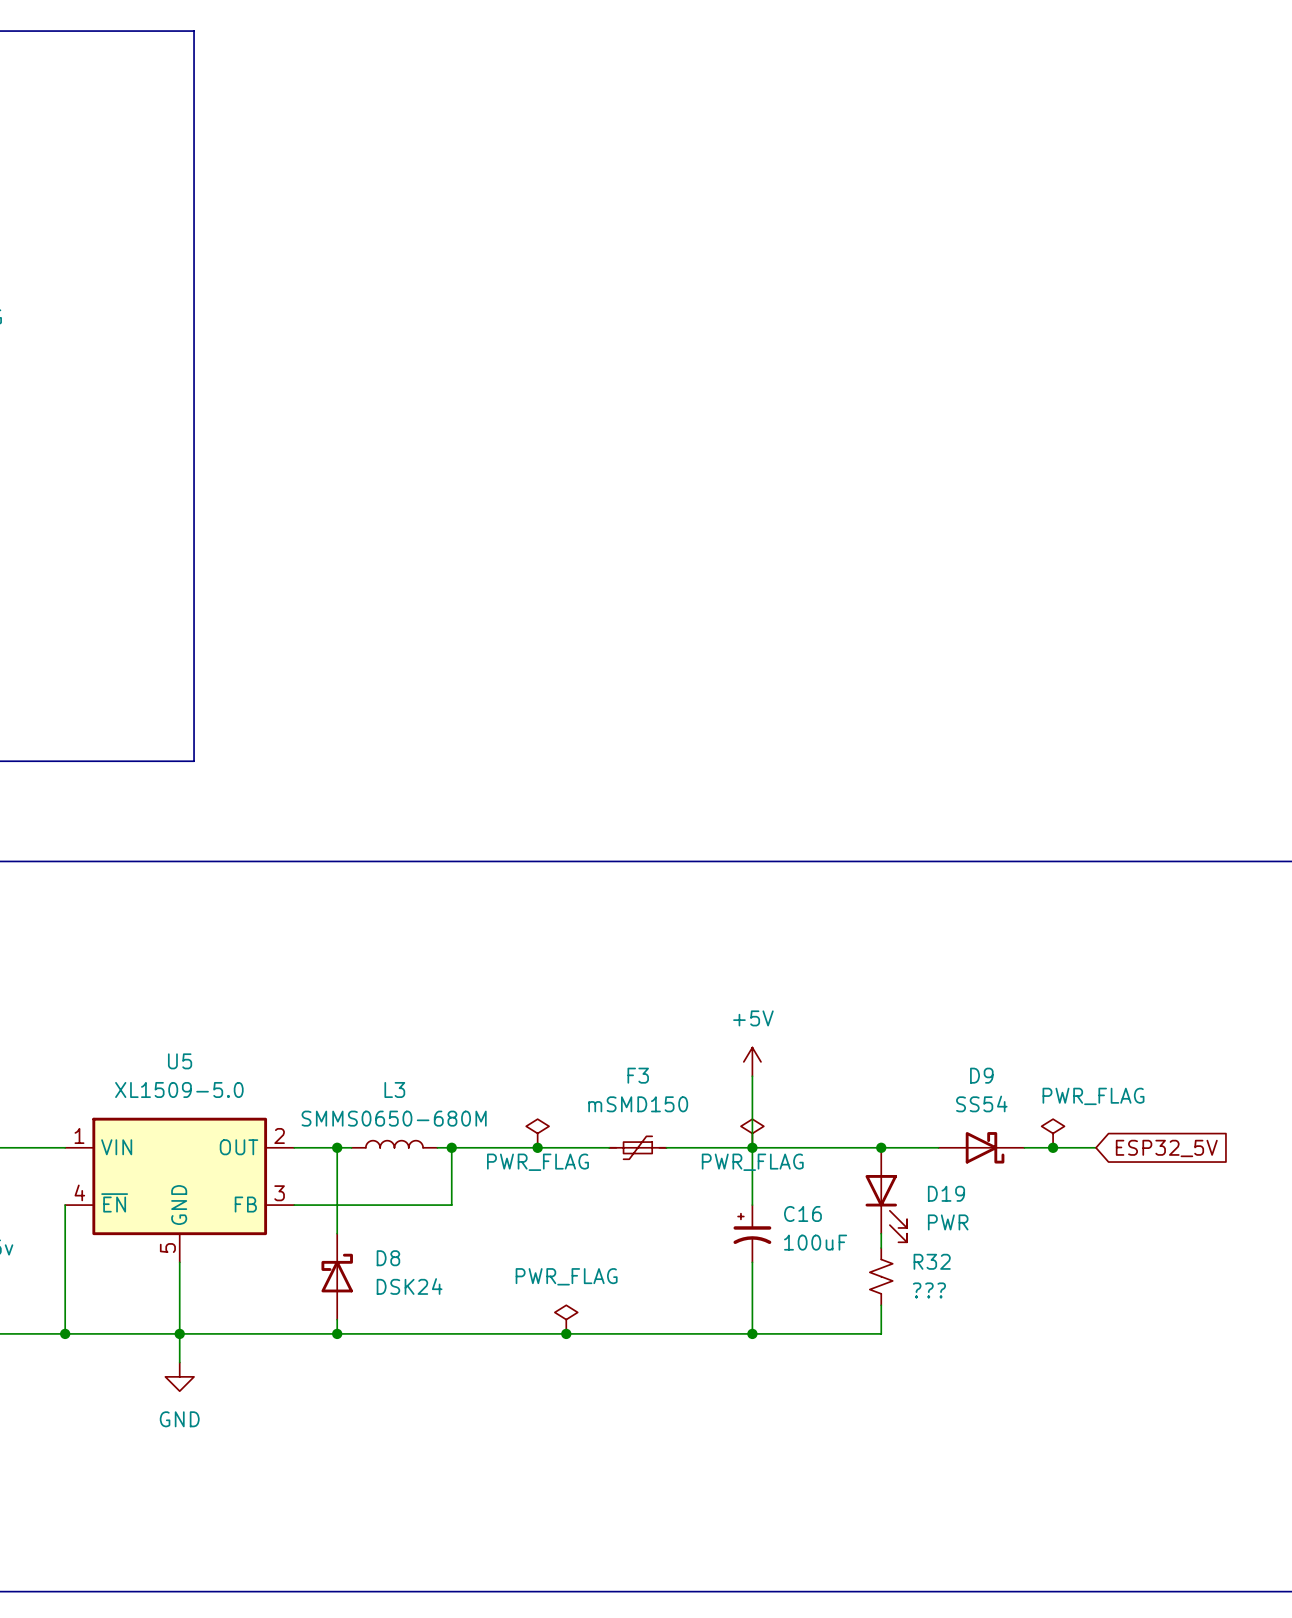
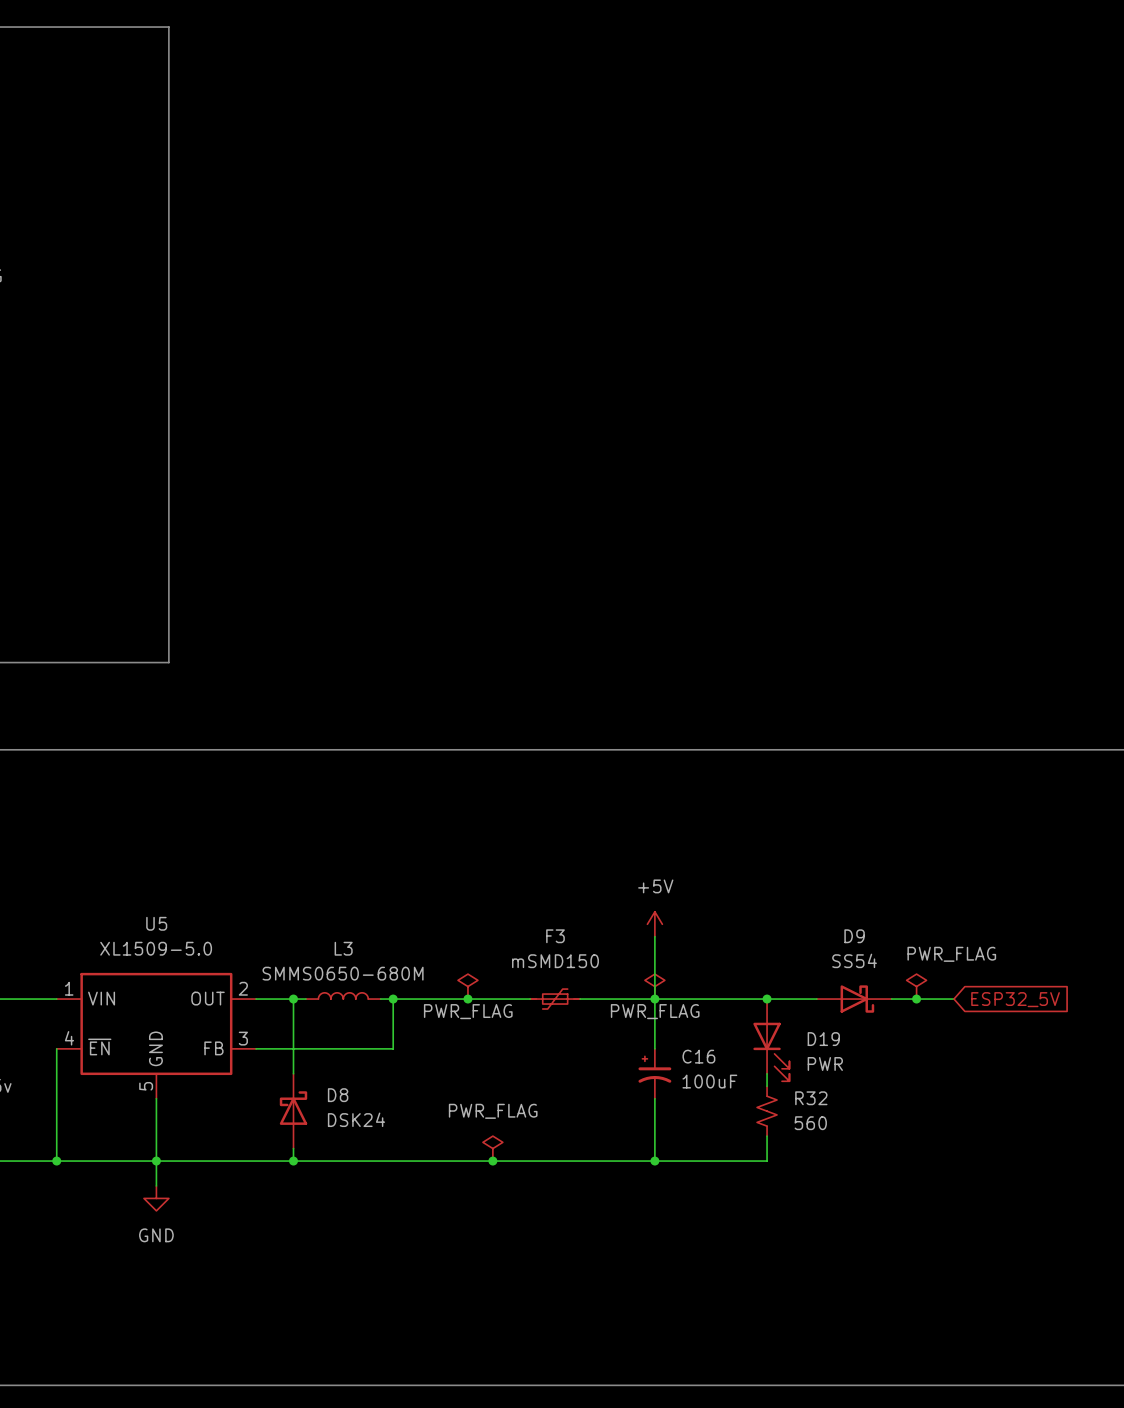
R32 value: ??? (929, 1290) -> 560 (810, 1123)

